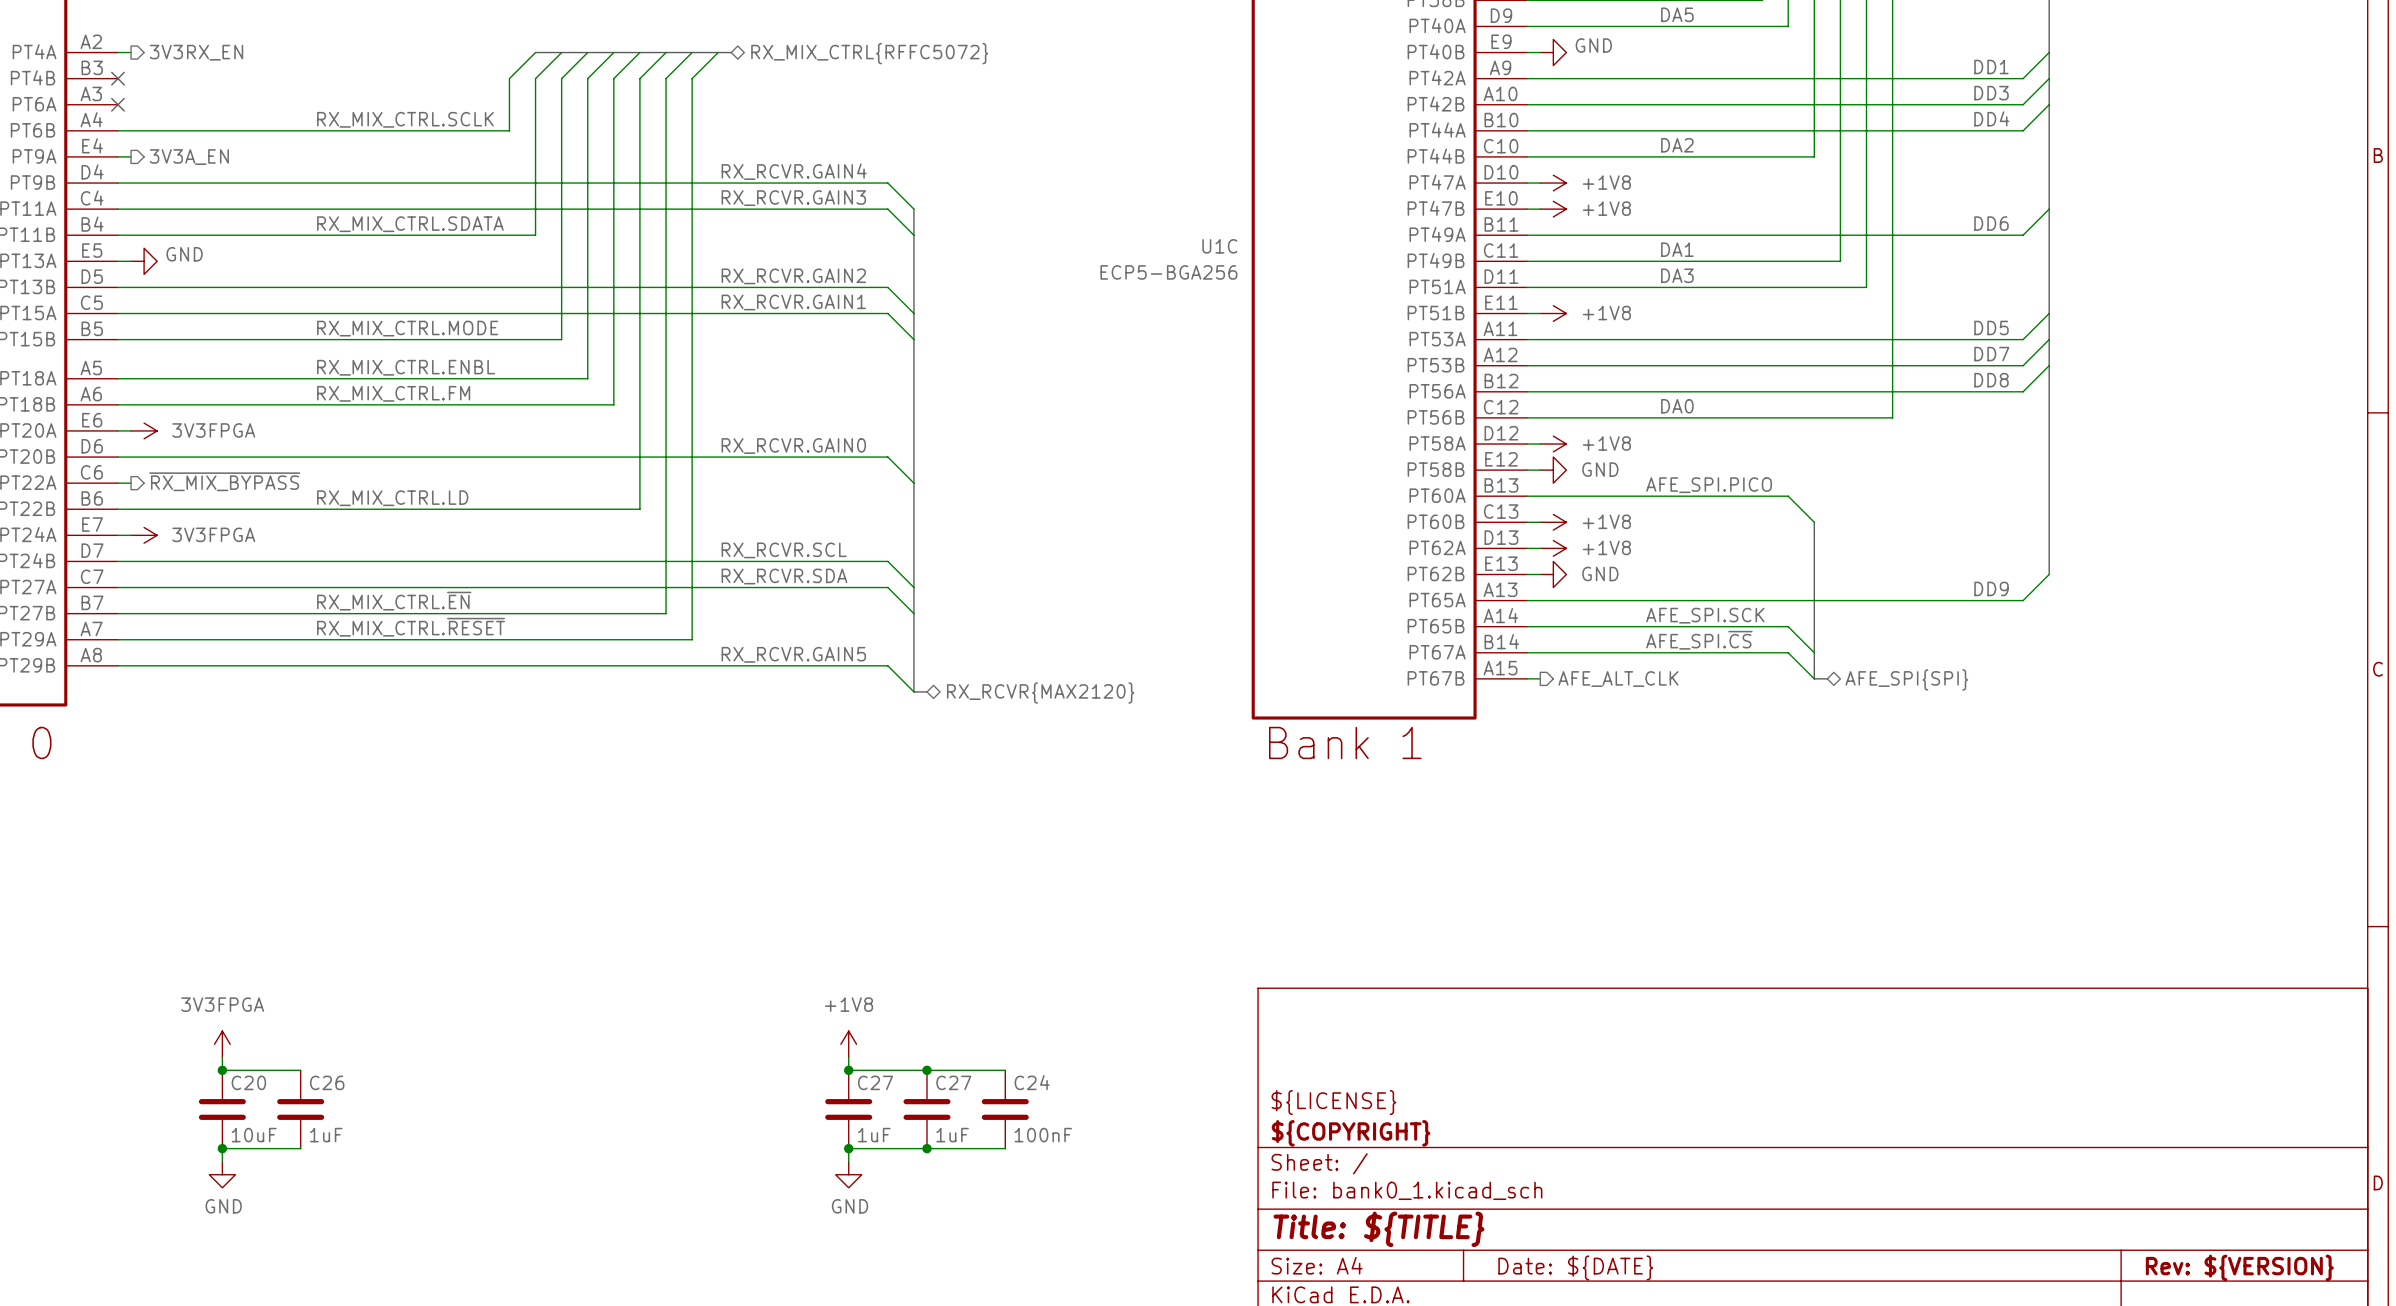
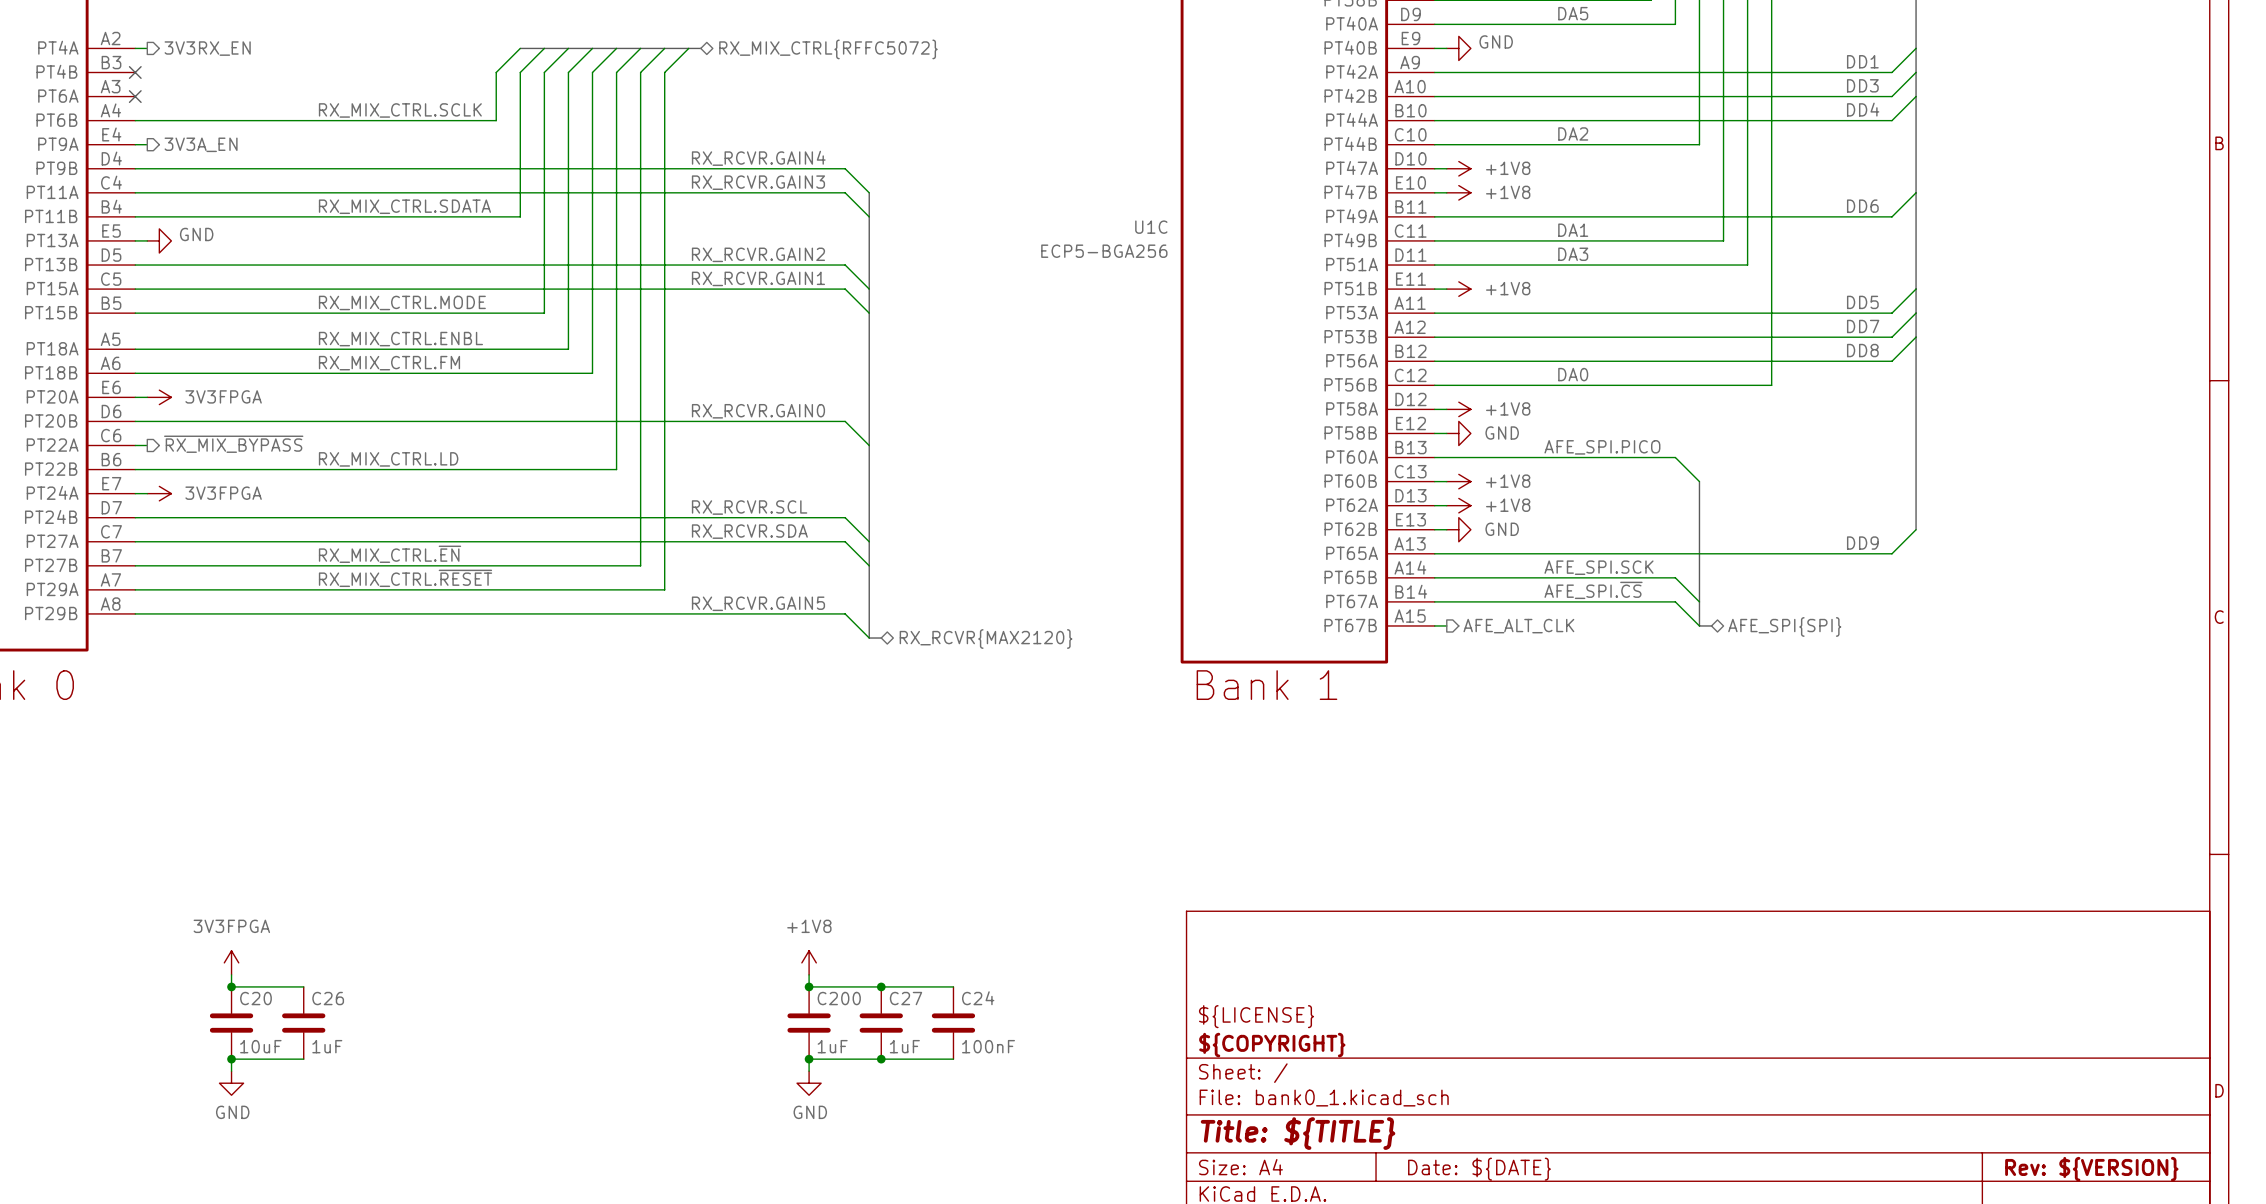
C27 name: C27 (875, 1082) -> C200 (839, 998)

